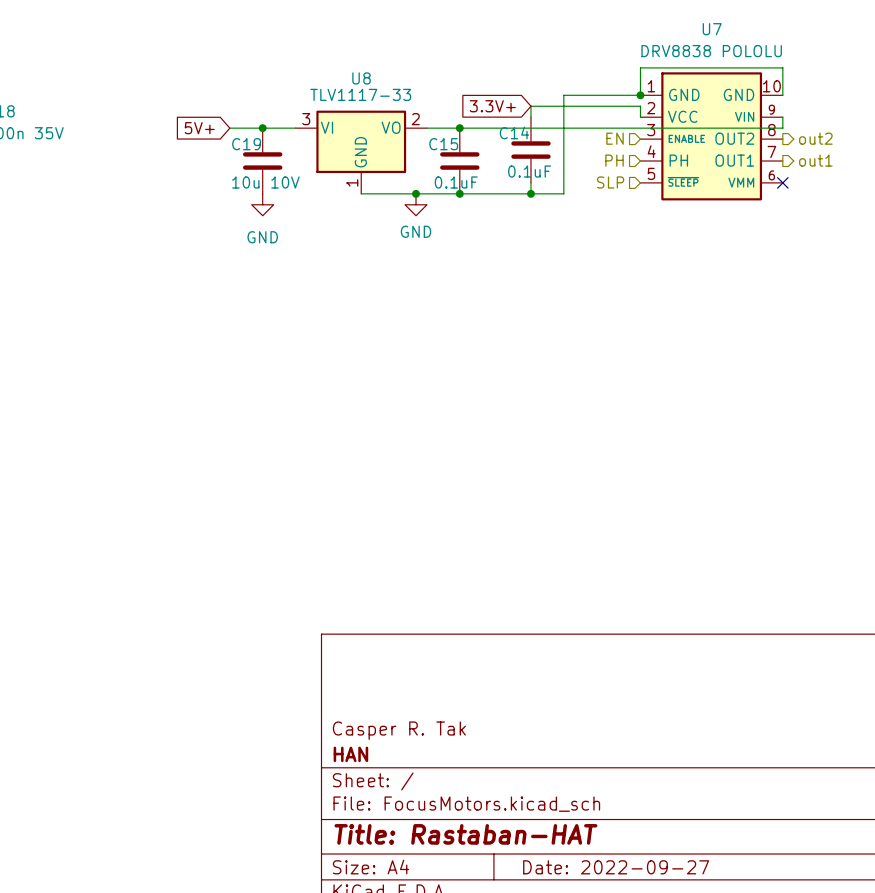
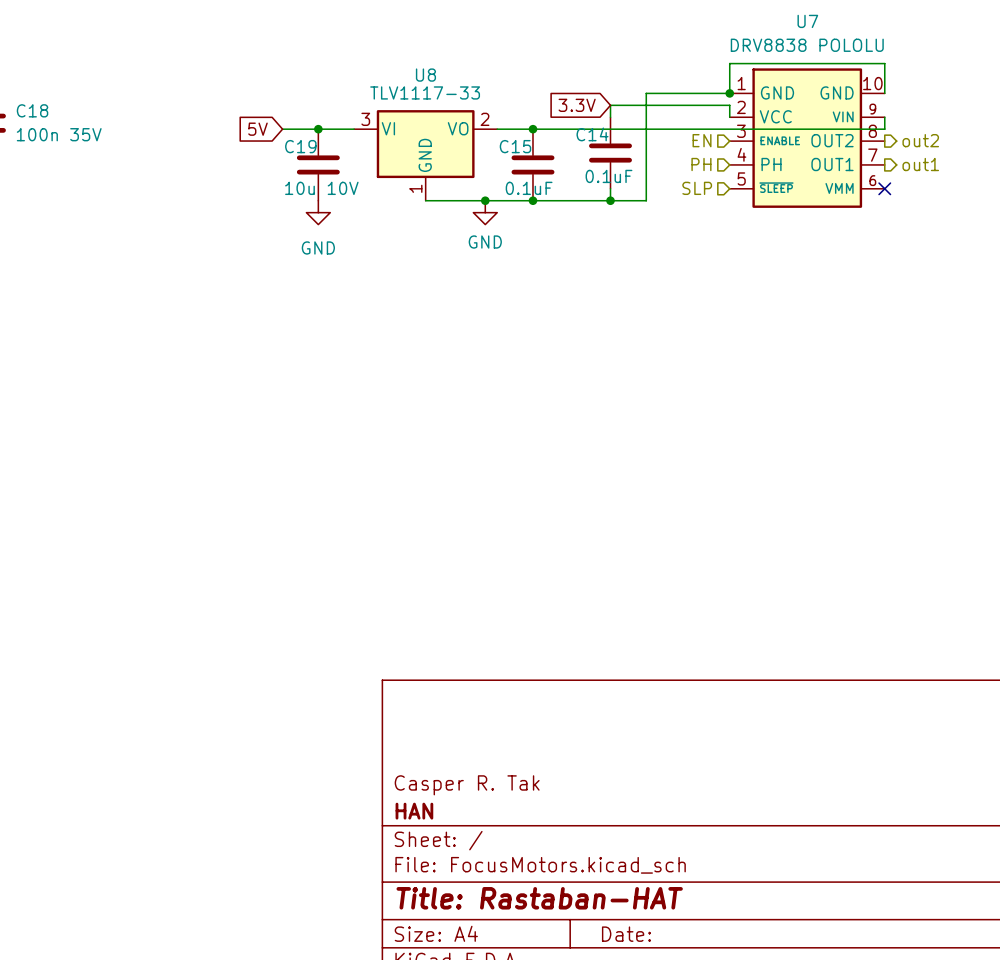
global label: 3.3V+ (492, 106) -> 3.3V (577, 105)
global label: 5V+ (199, 128) -> 5V (257, 129)
title block: Date: 2022-09-27 (616, 867) -> Date: (626, 934)

